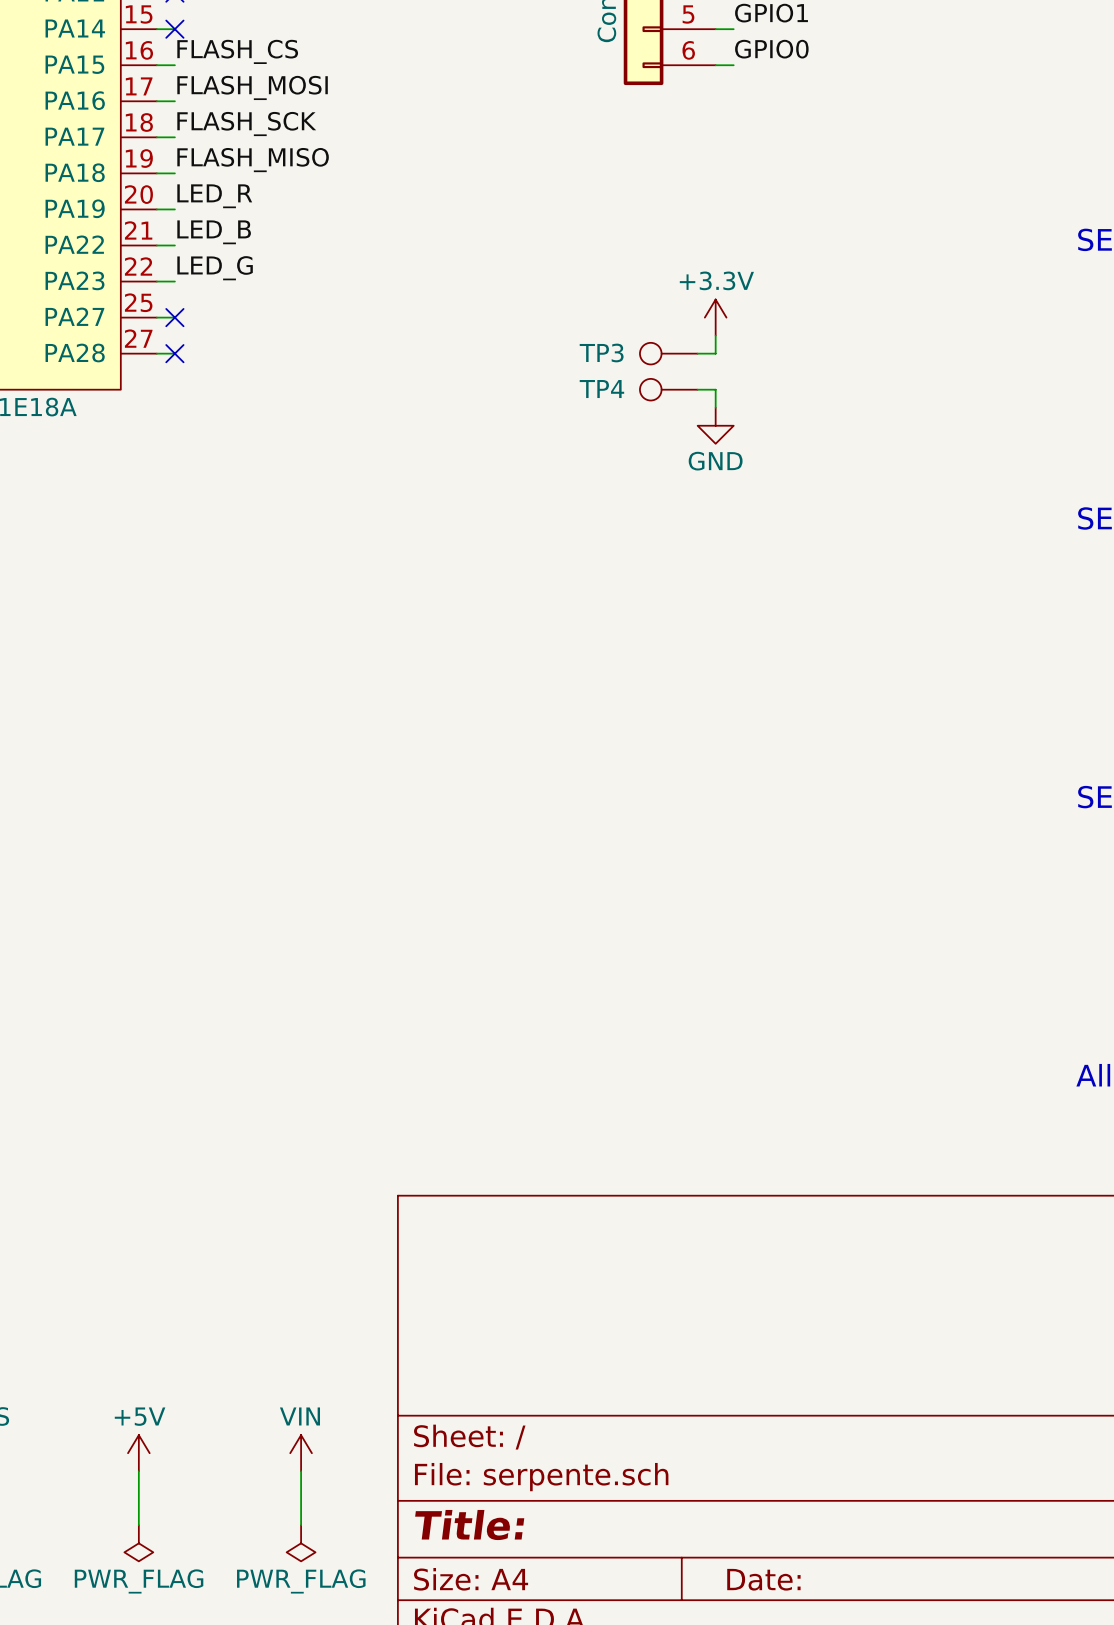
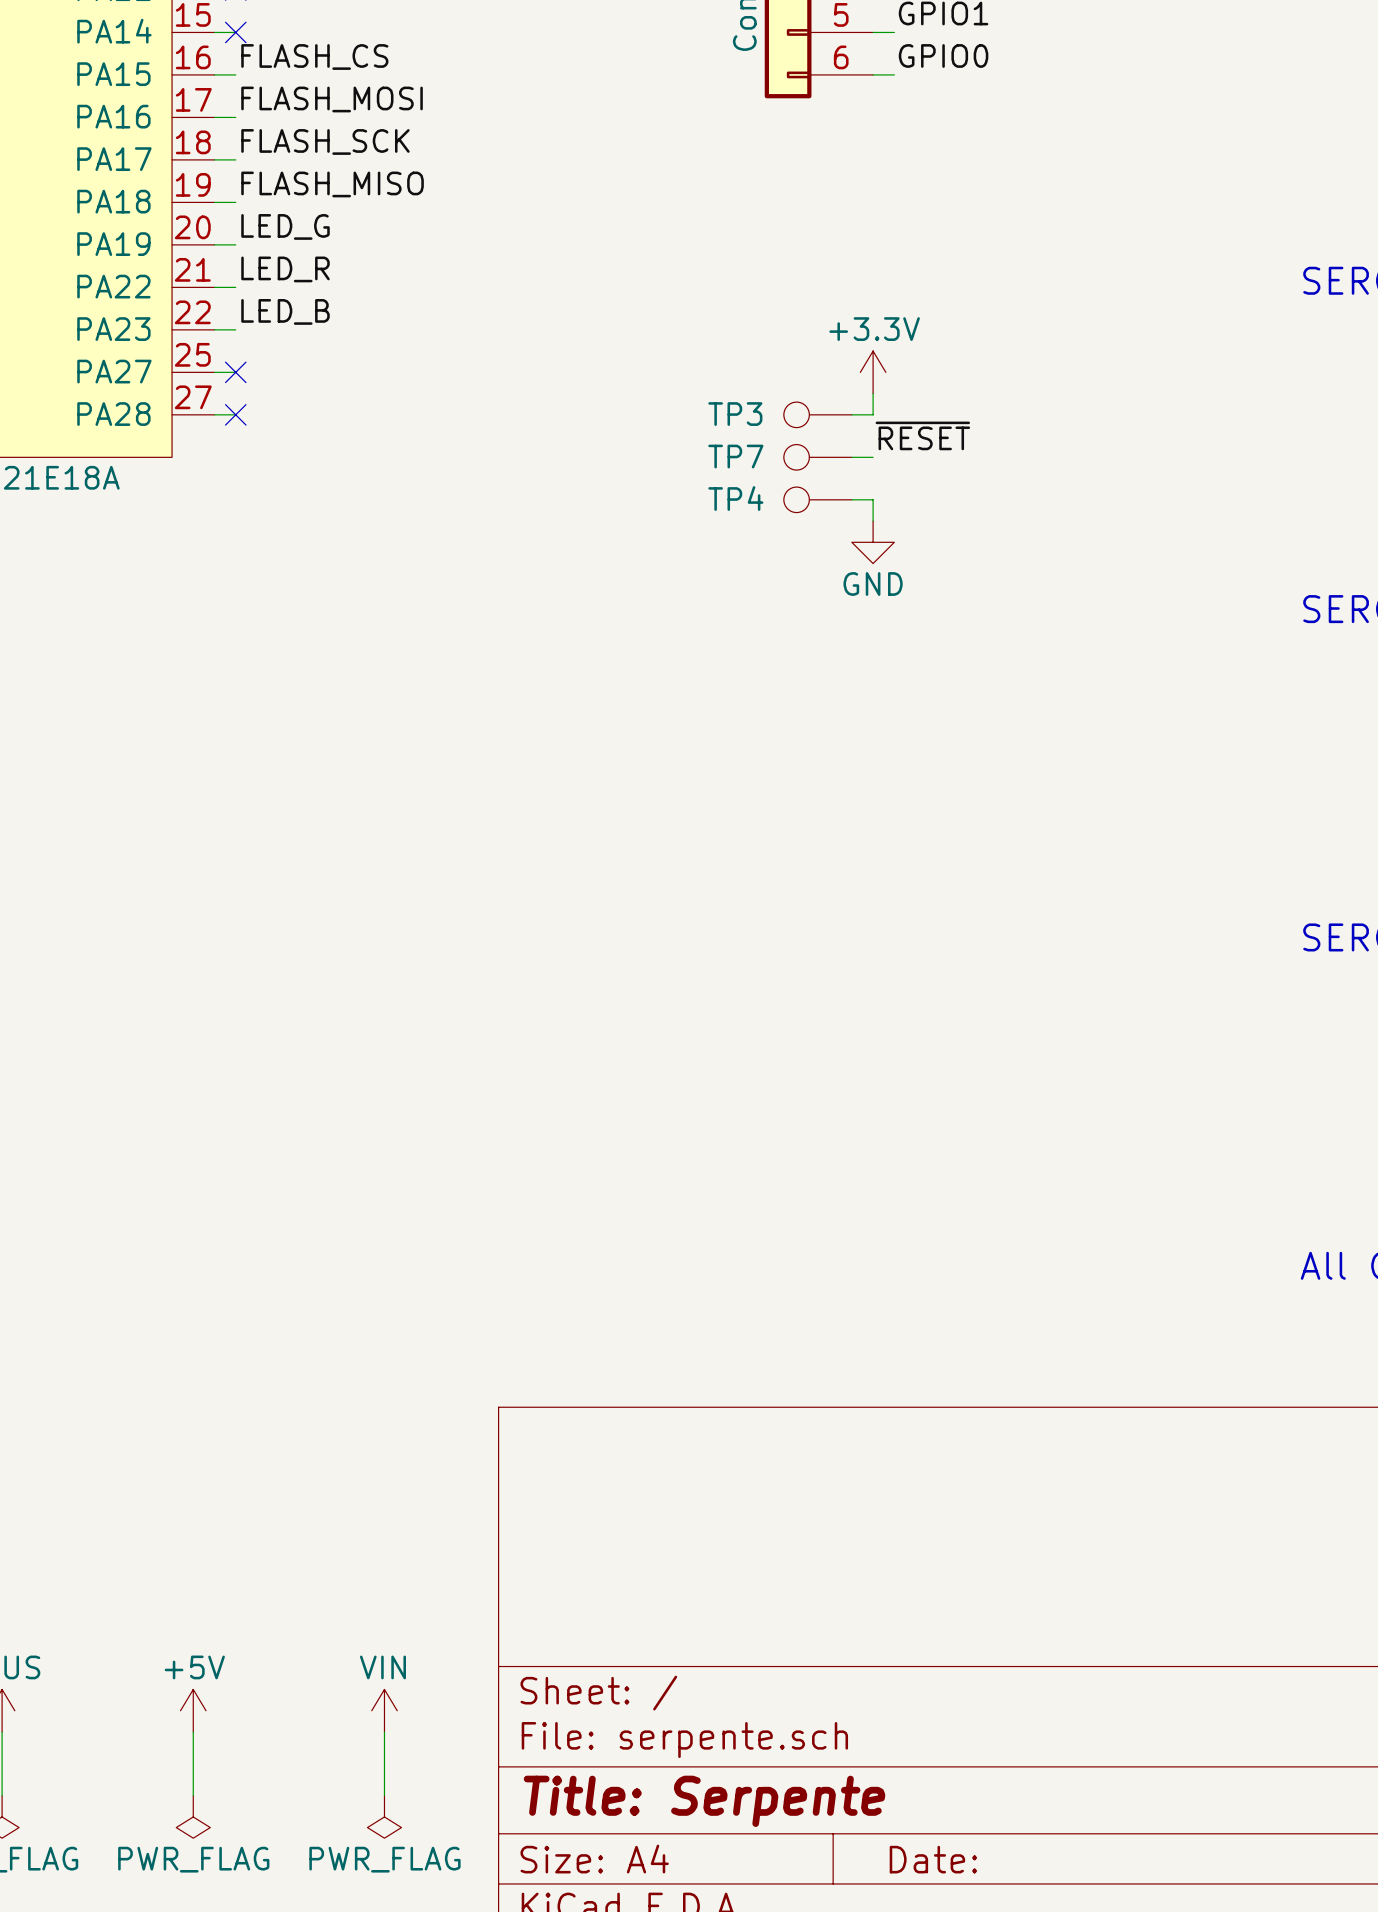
label: LED_R (214, 196) -> LED_G (285, 226)
label: LED_B (214, 232) -> LED_R (285, 269)
label: LED_G (215, 268) -> LED_B (285, 311)
label: none -> ~{RESET} (922, 435)
TP4 name: TP4 (601, 389) -> TP7 (735, 456)
wire: (715, 389) (715, 407) -> none
TP4: none -> (817, 499)
wire: none -> (851, 499) (873, 499) (873, 521)
power symbol position: GND (715, 425) -> GND (873, 542)
title block: Title: (469, 1525) -> Title: Serpente (704, 1801)

